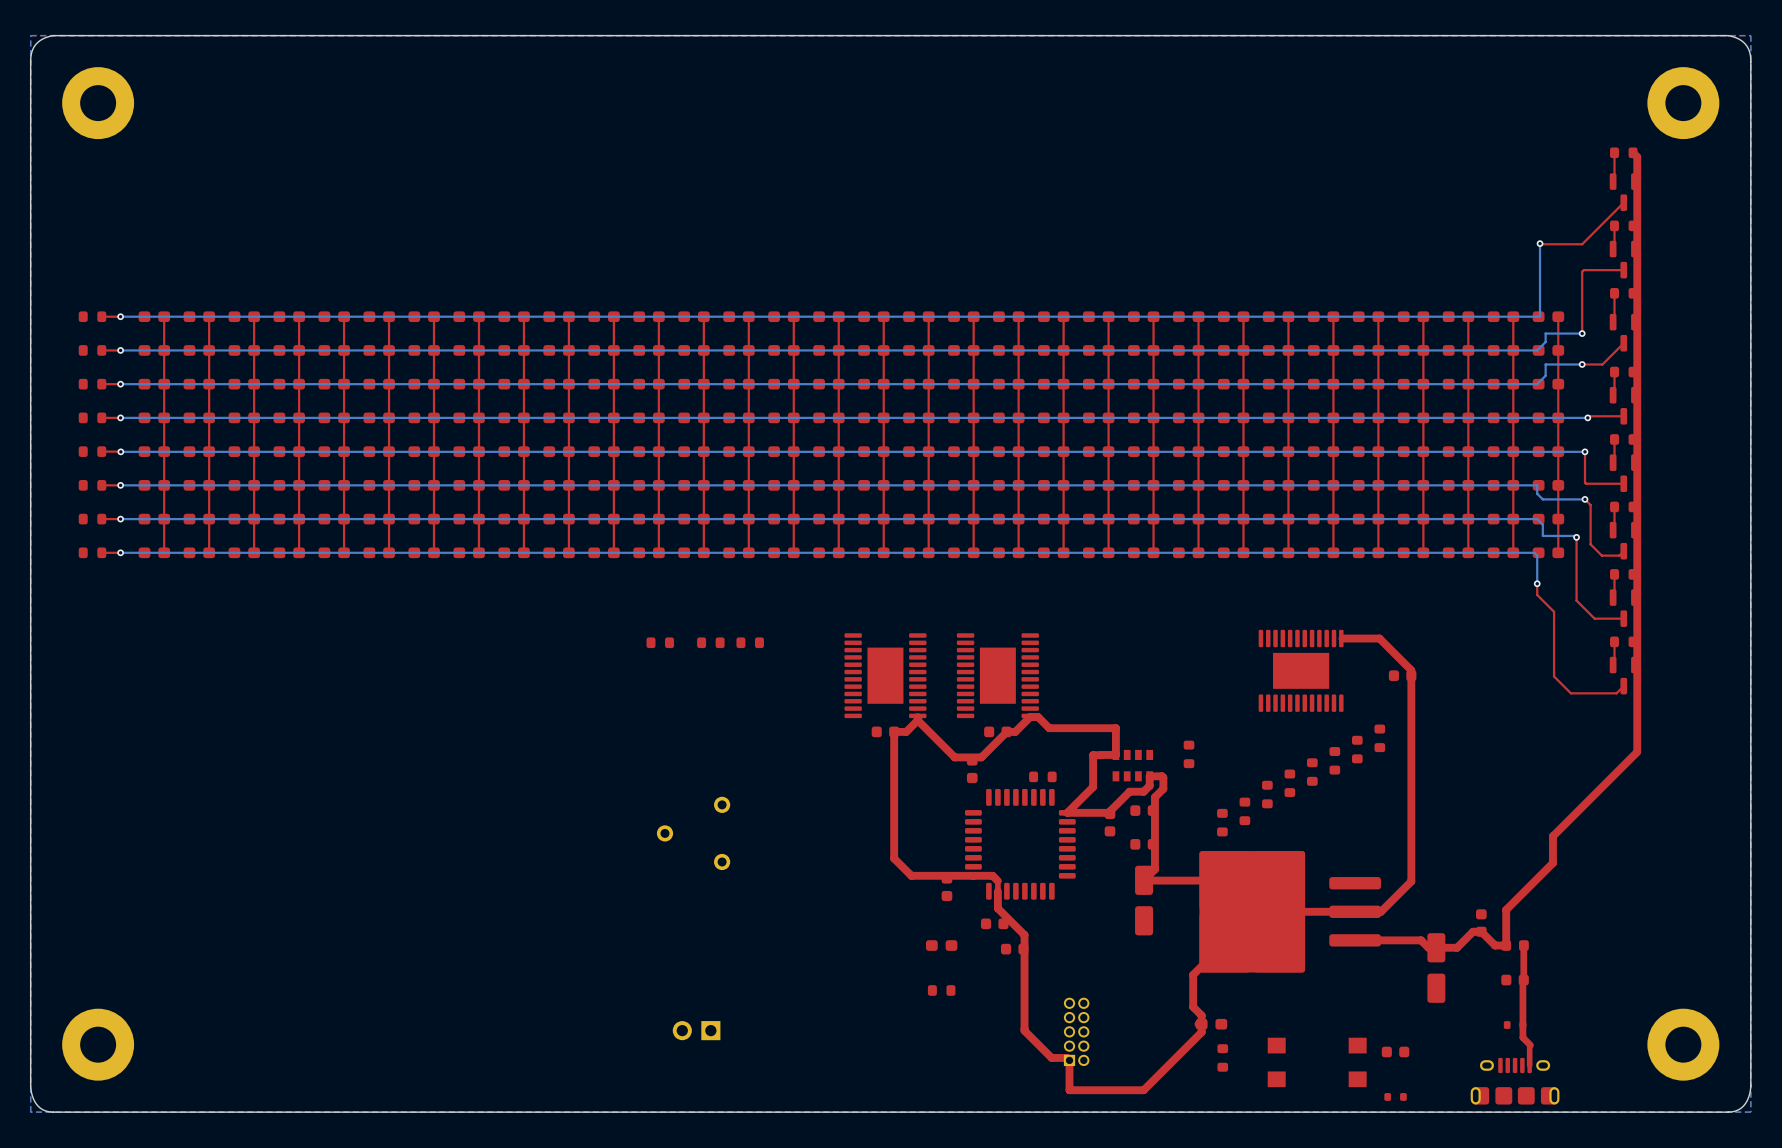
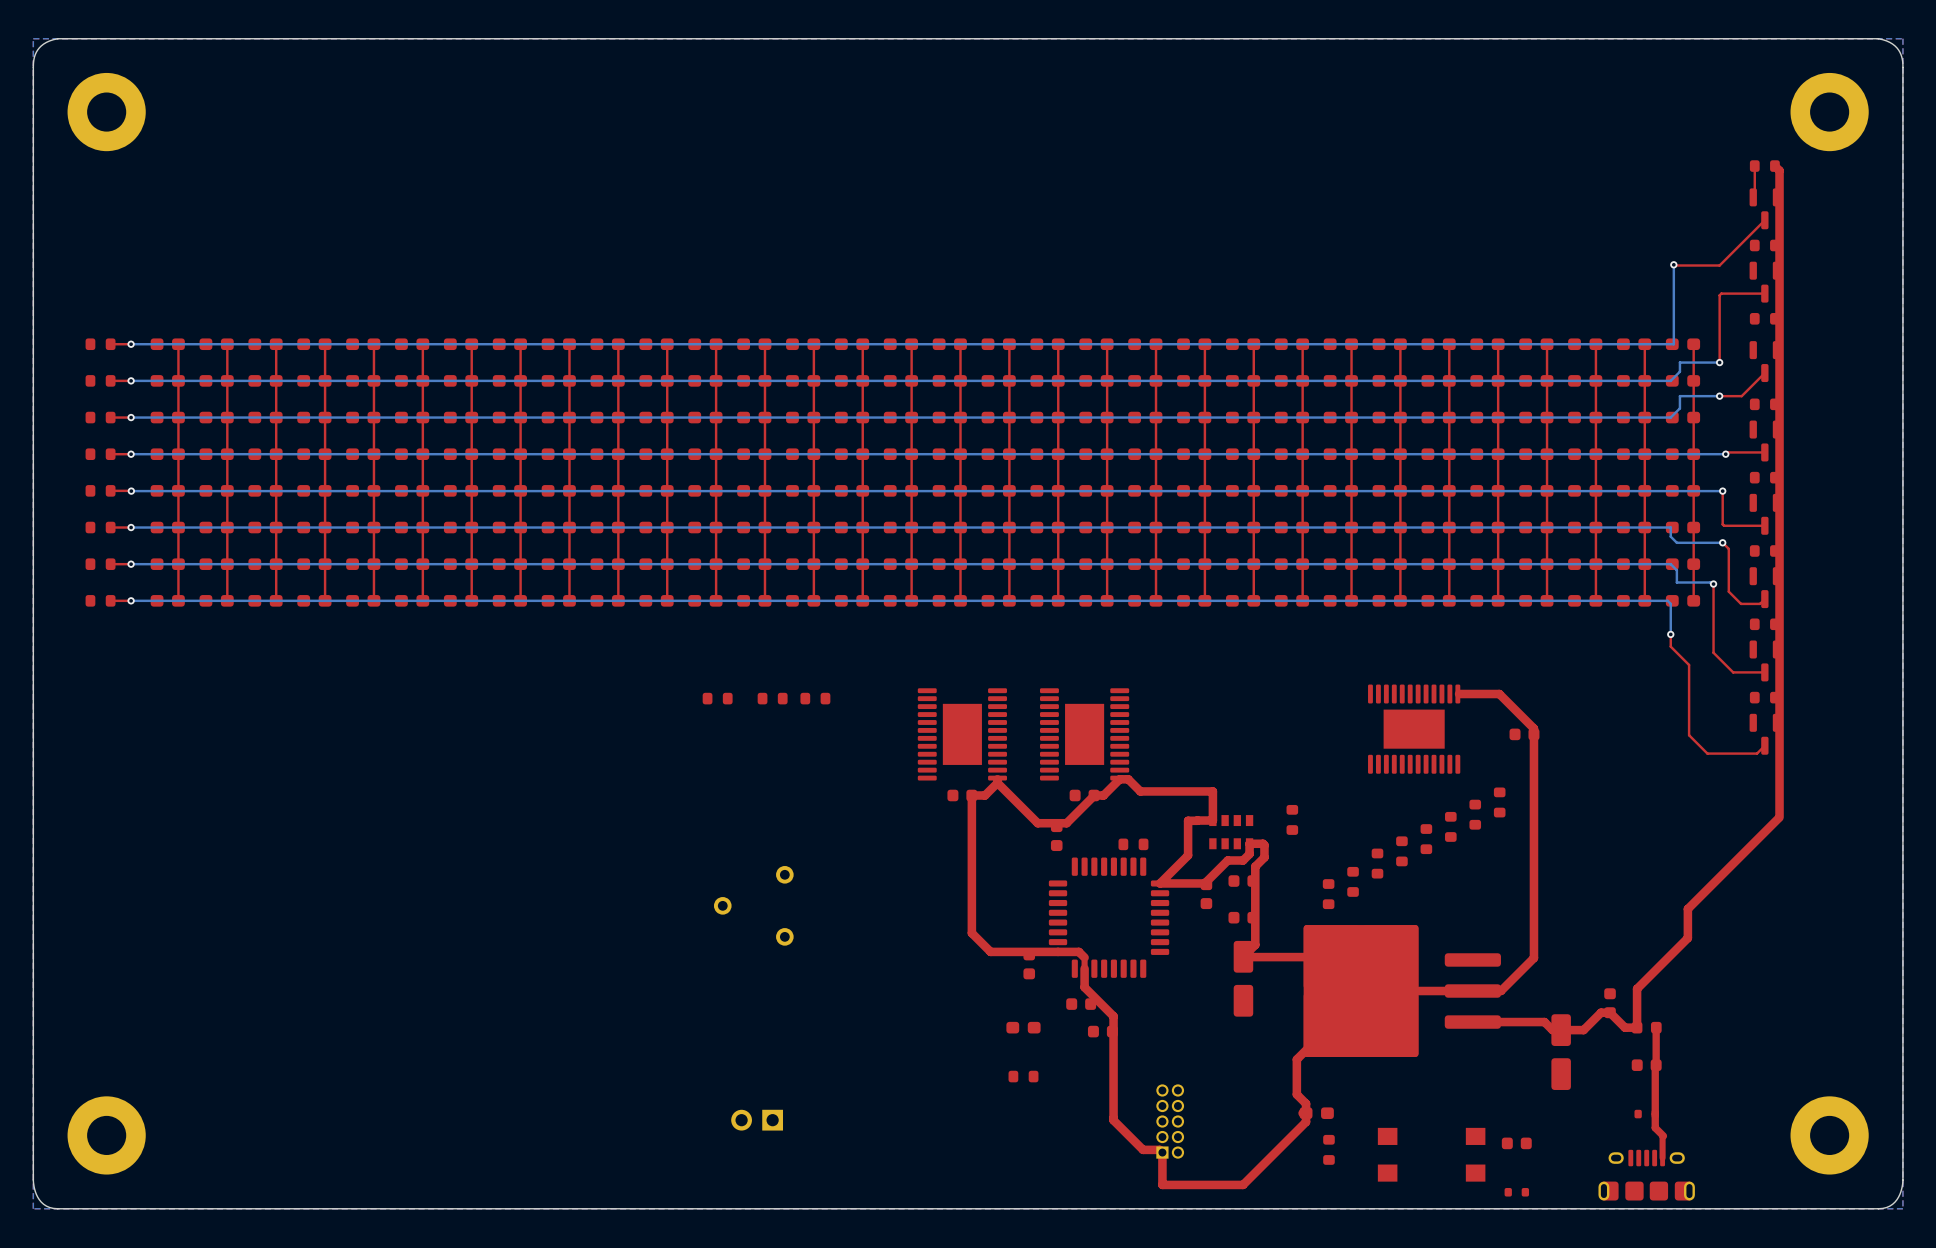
top track: (1614, 225) (1613, 249) -> none
top track: (1614, 293) (1613, 322) -> none
top track: (1614, 372) (1613, 395) -> none
top track: (1614, 439) (1613, 462) -> none
top track: (1614, 506) (1613, 530) -> none
top track: (1614, 574) (1613, 597) -> none
top track: (1614, 641) (1613, 665) -> none

